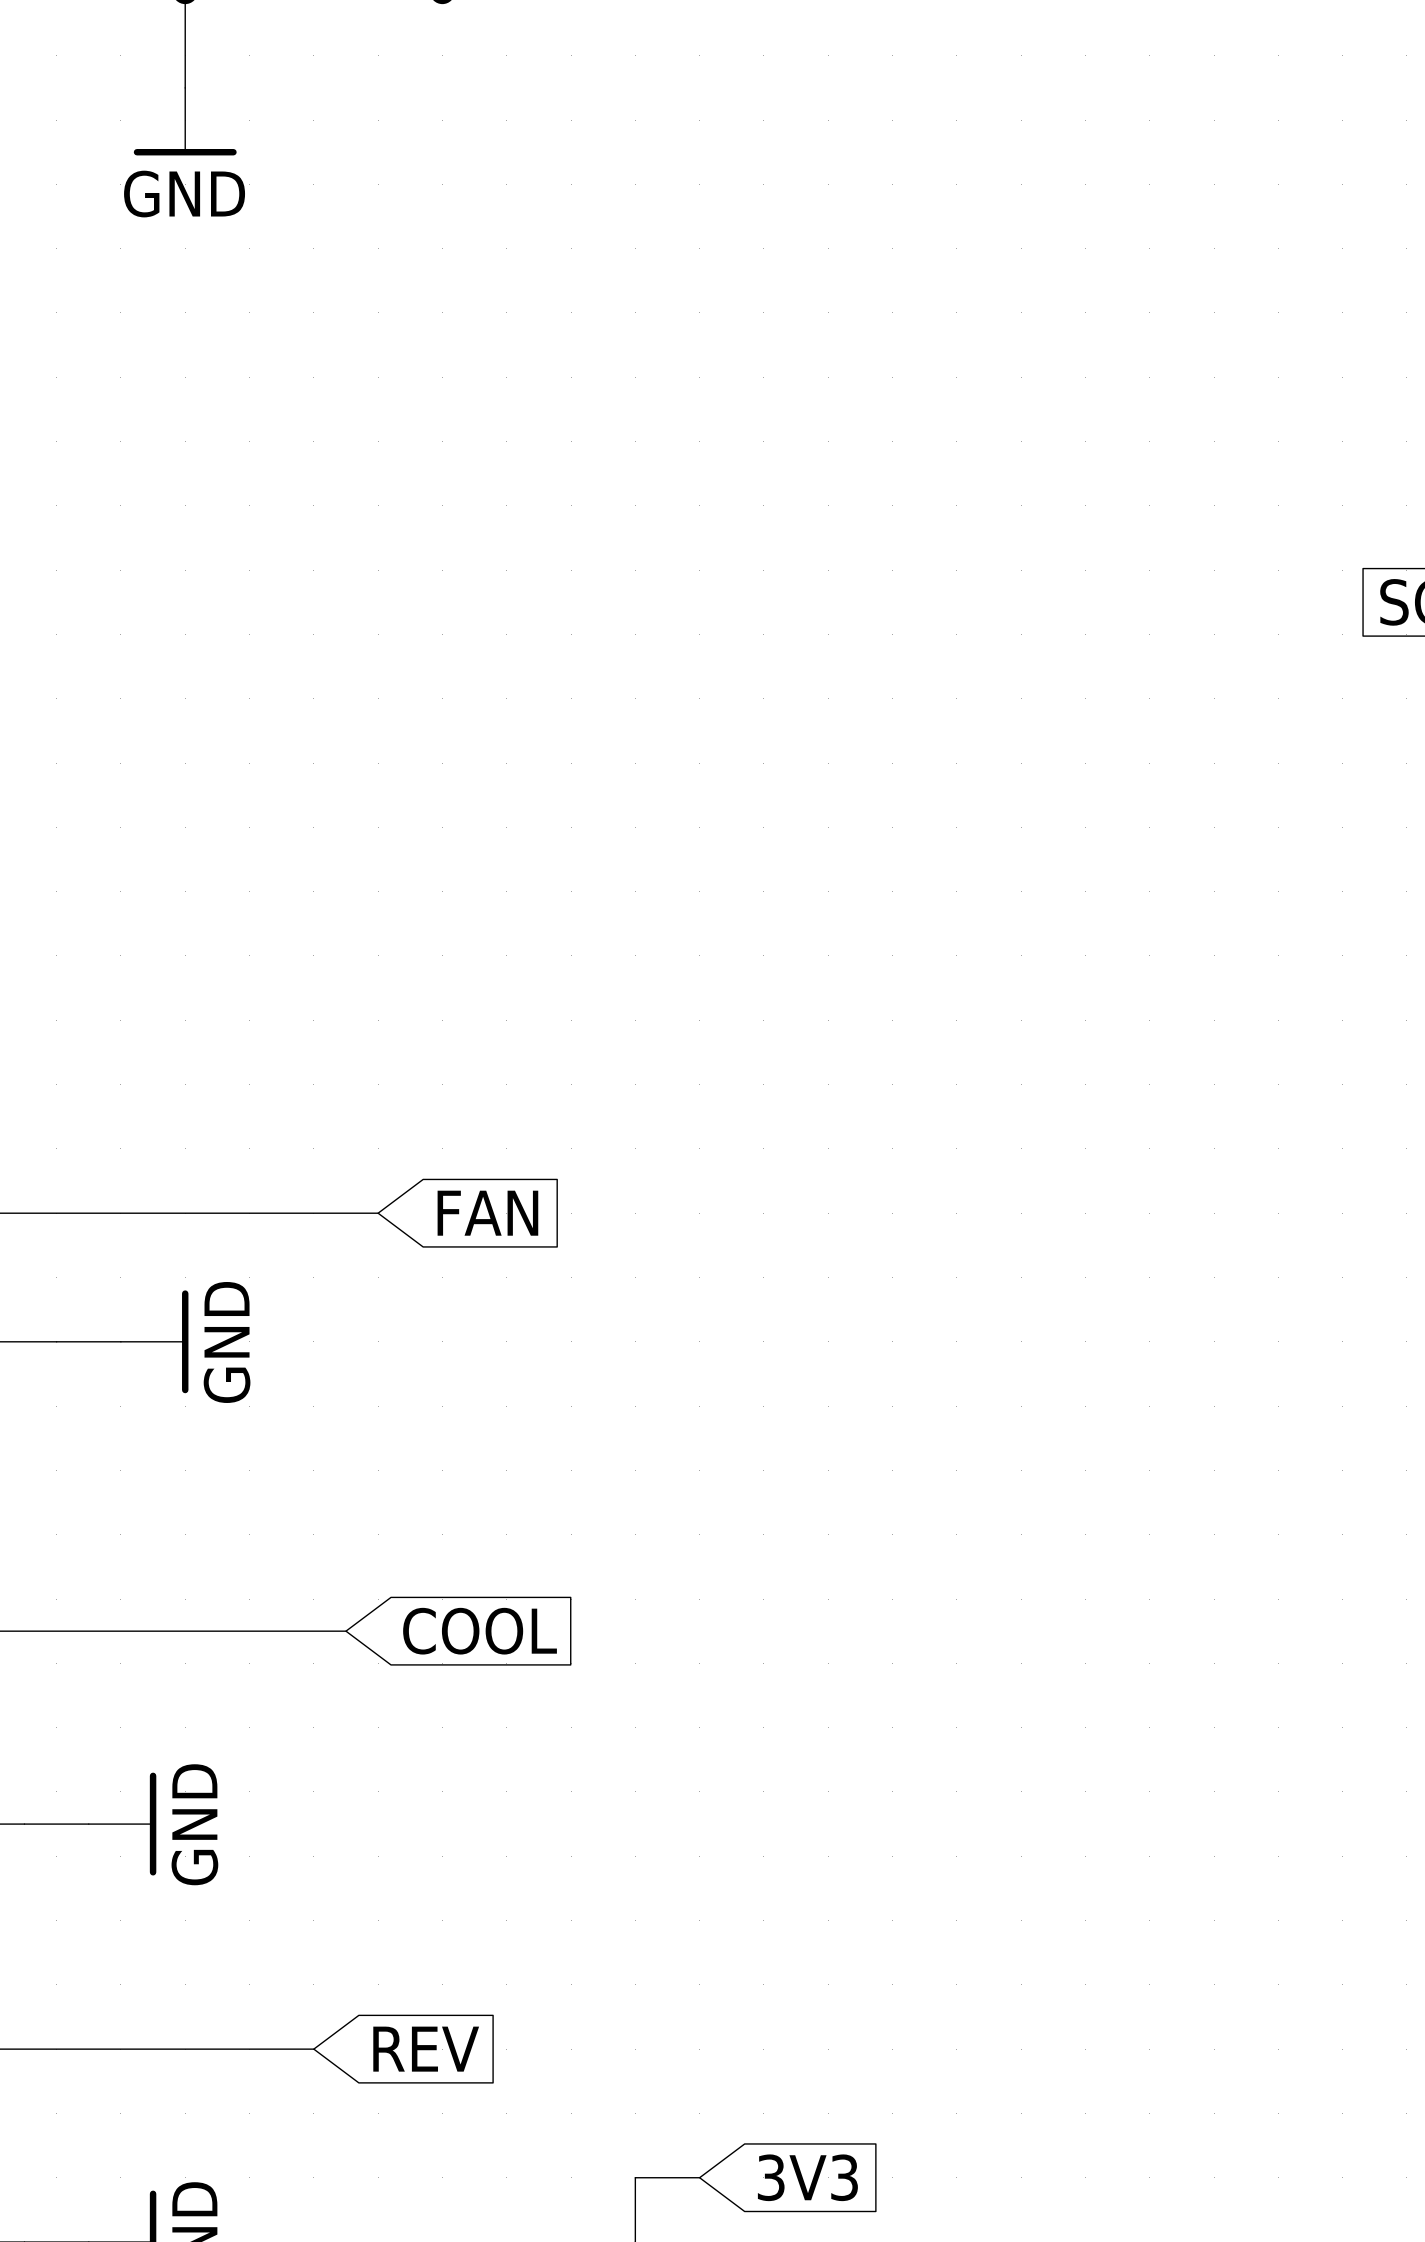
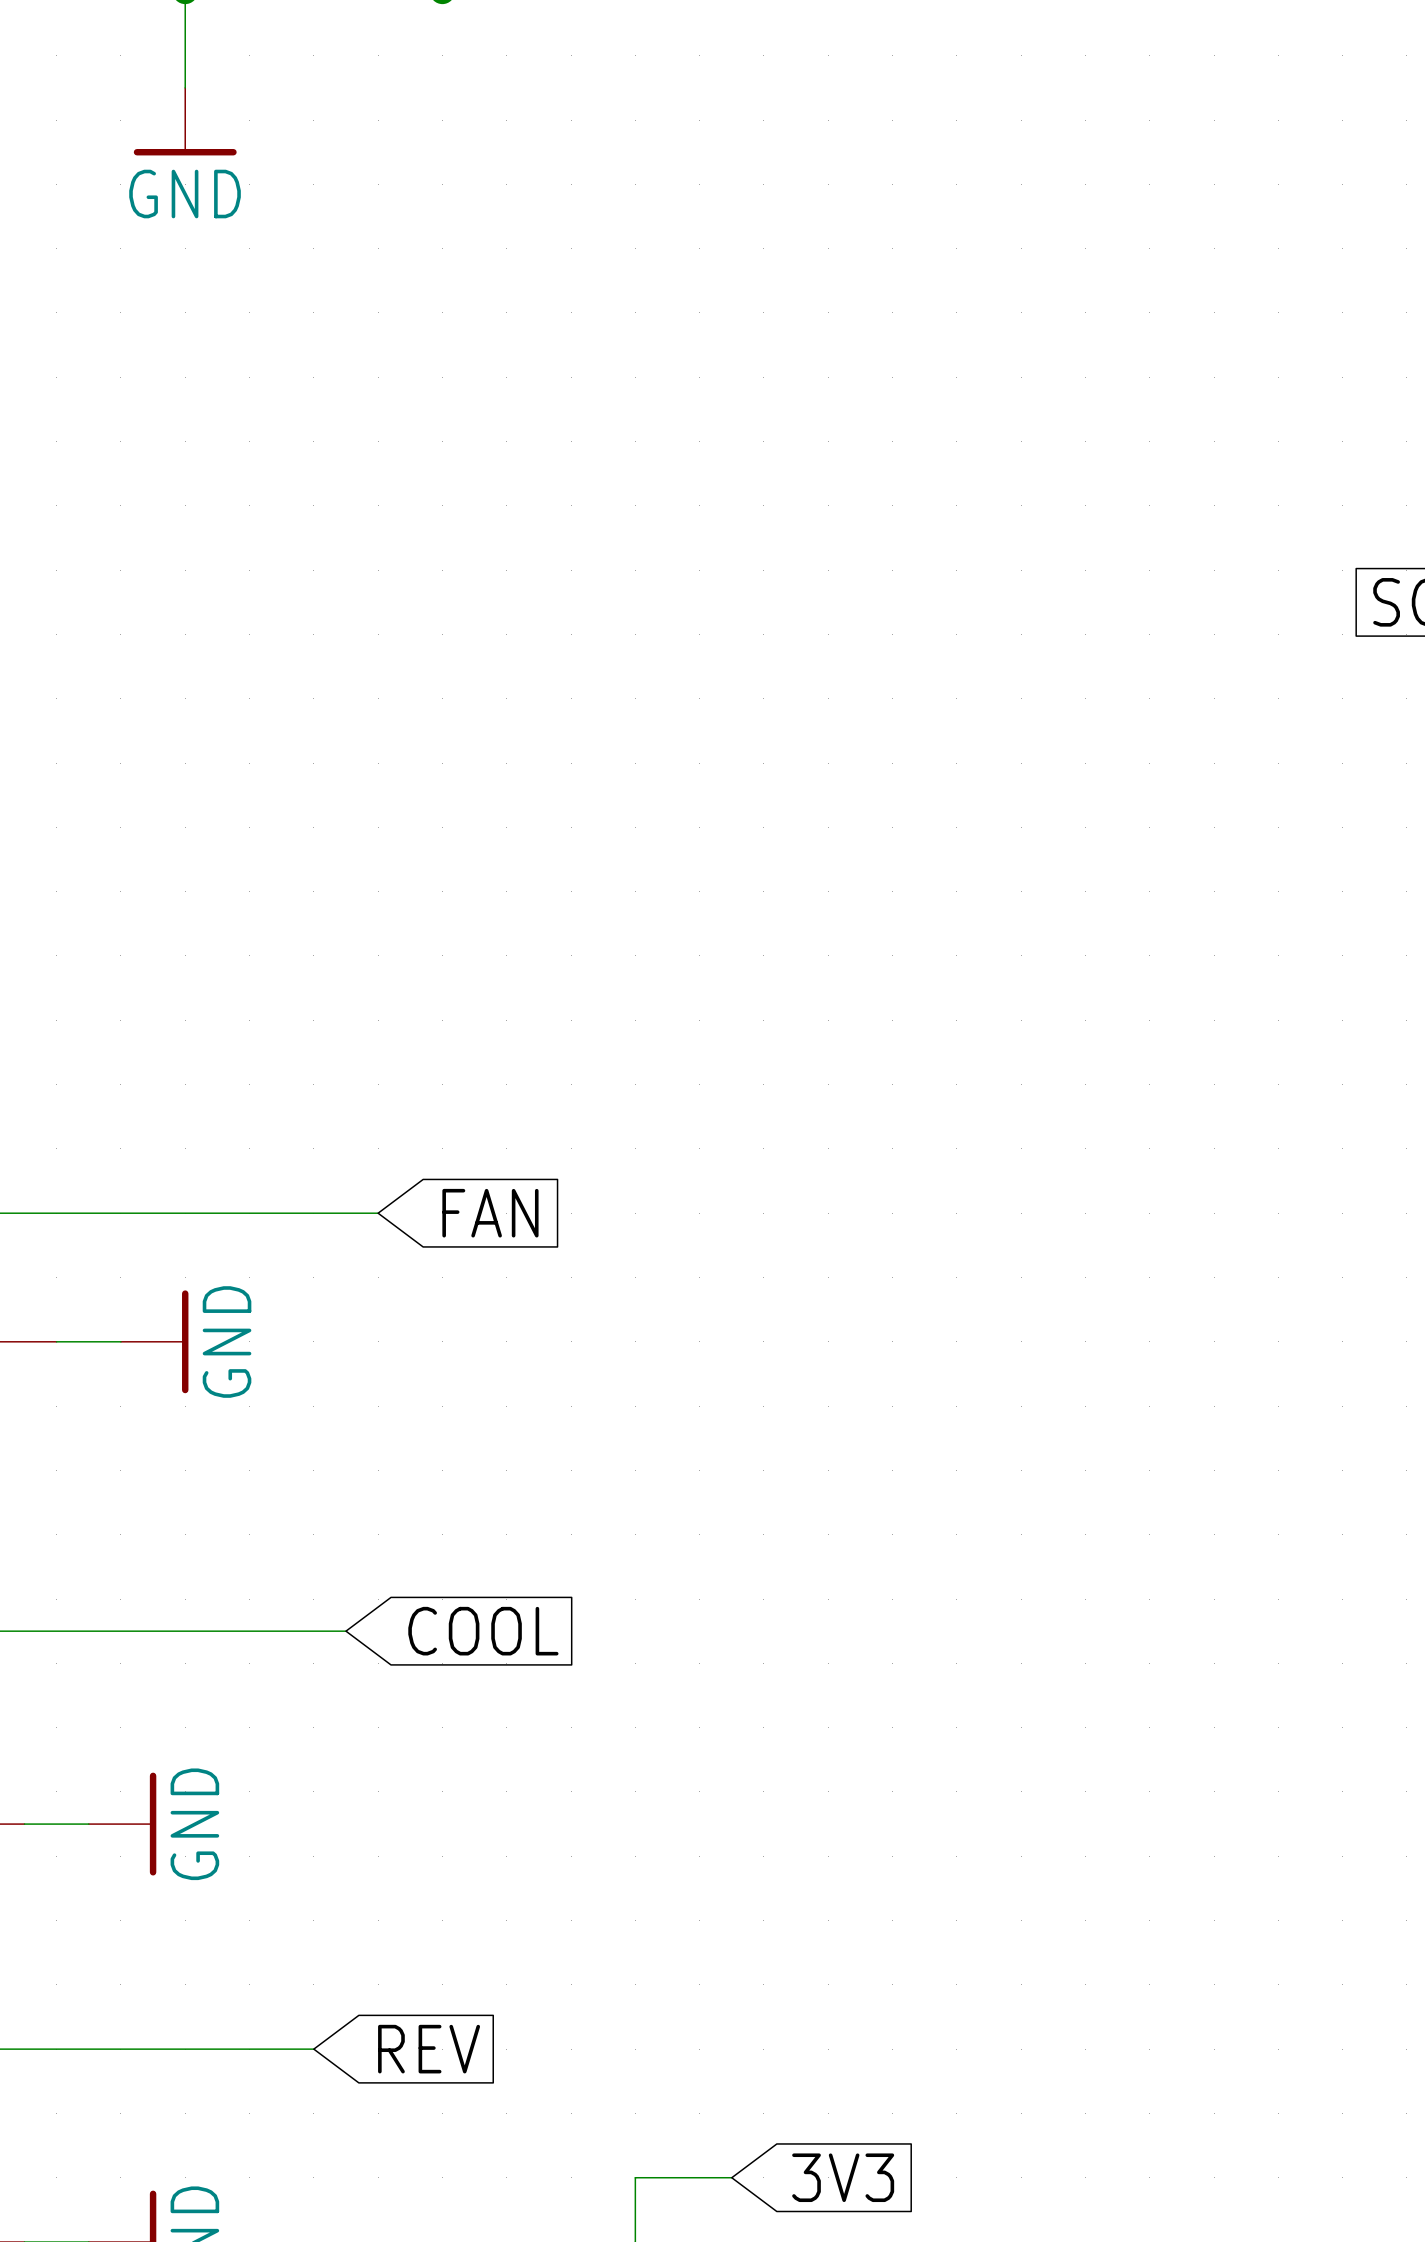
wire: none -> (699, 2177) (731, 2177)
global label position: 3V3 (807, 2177) -> 3V3 (843, 2177)

